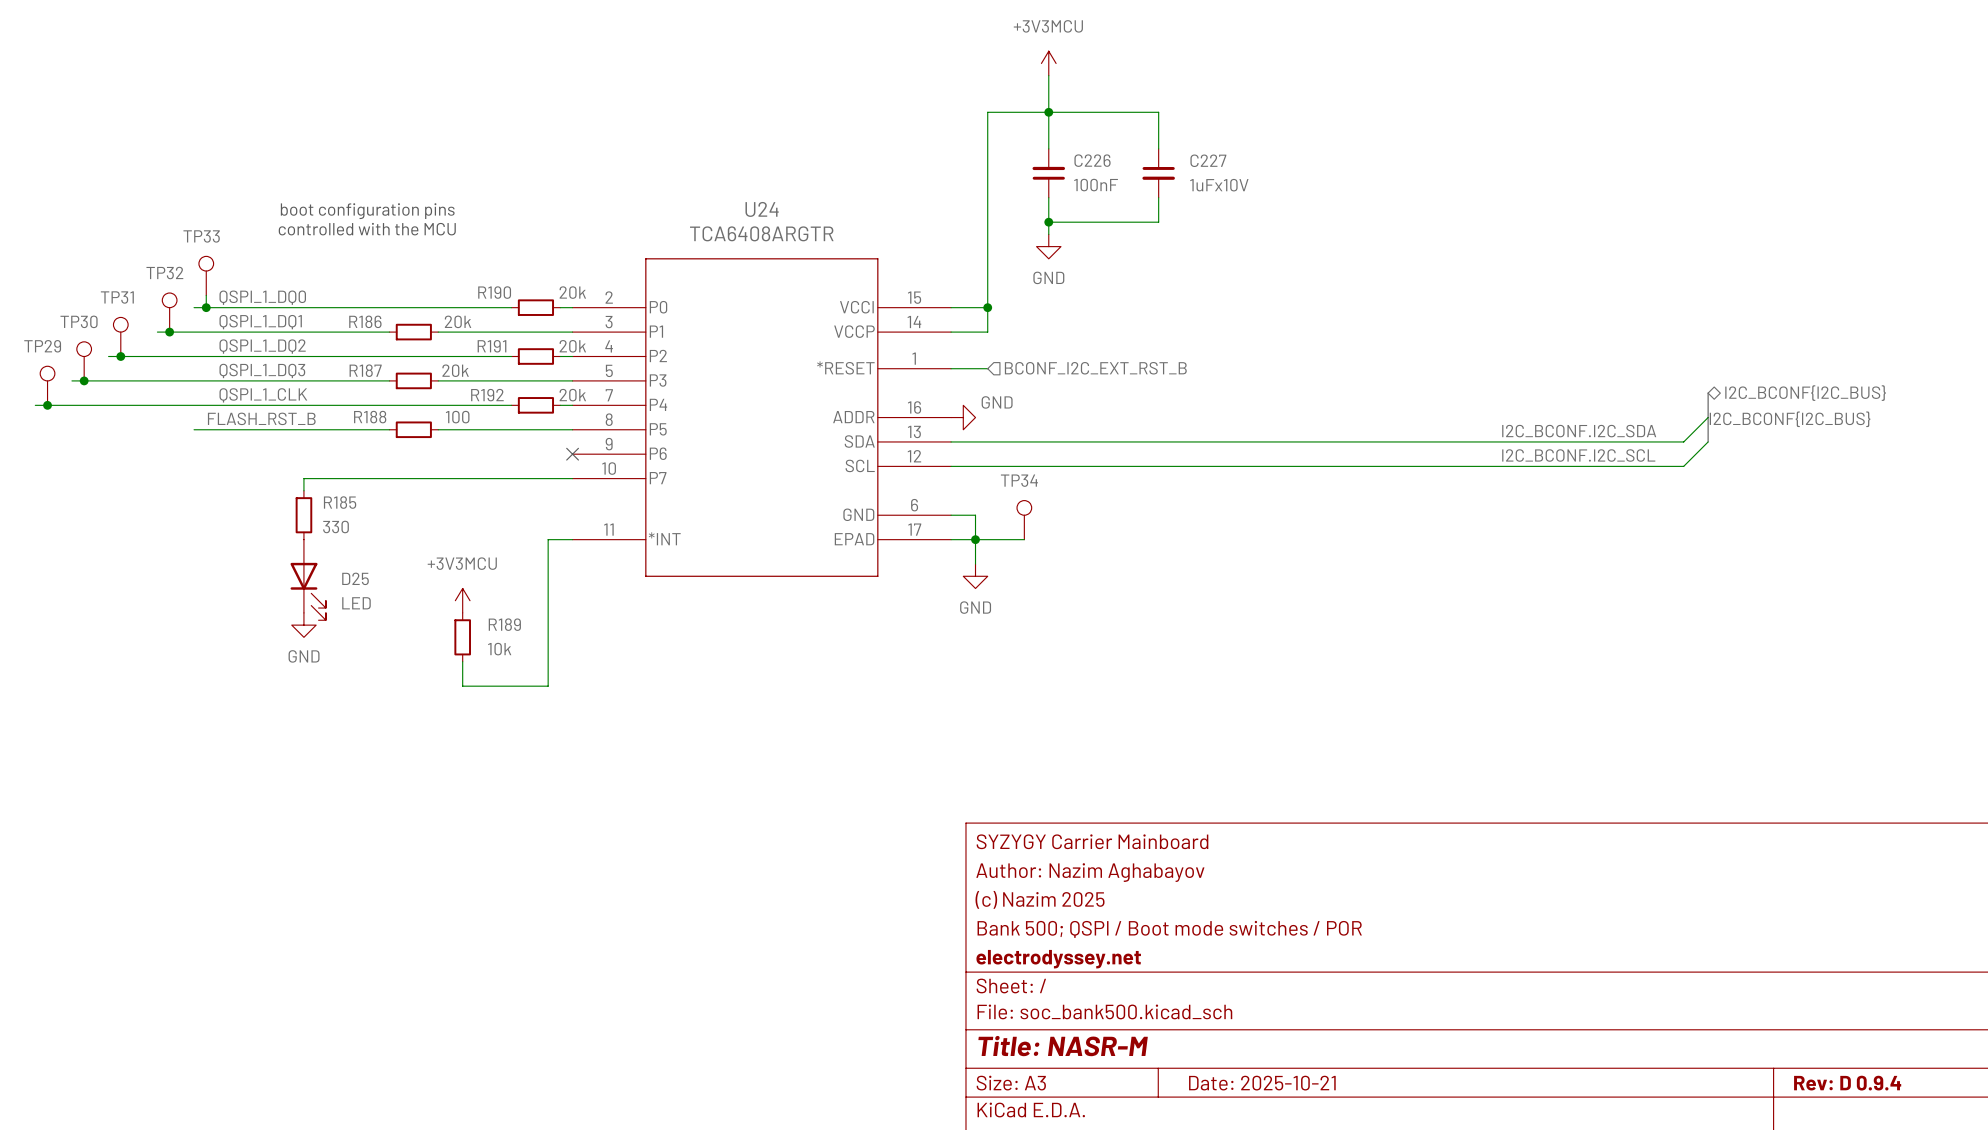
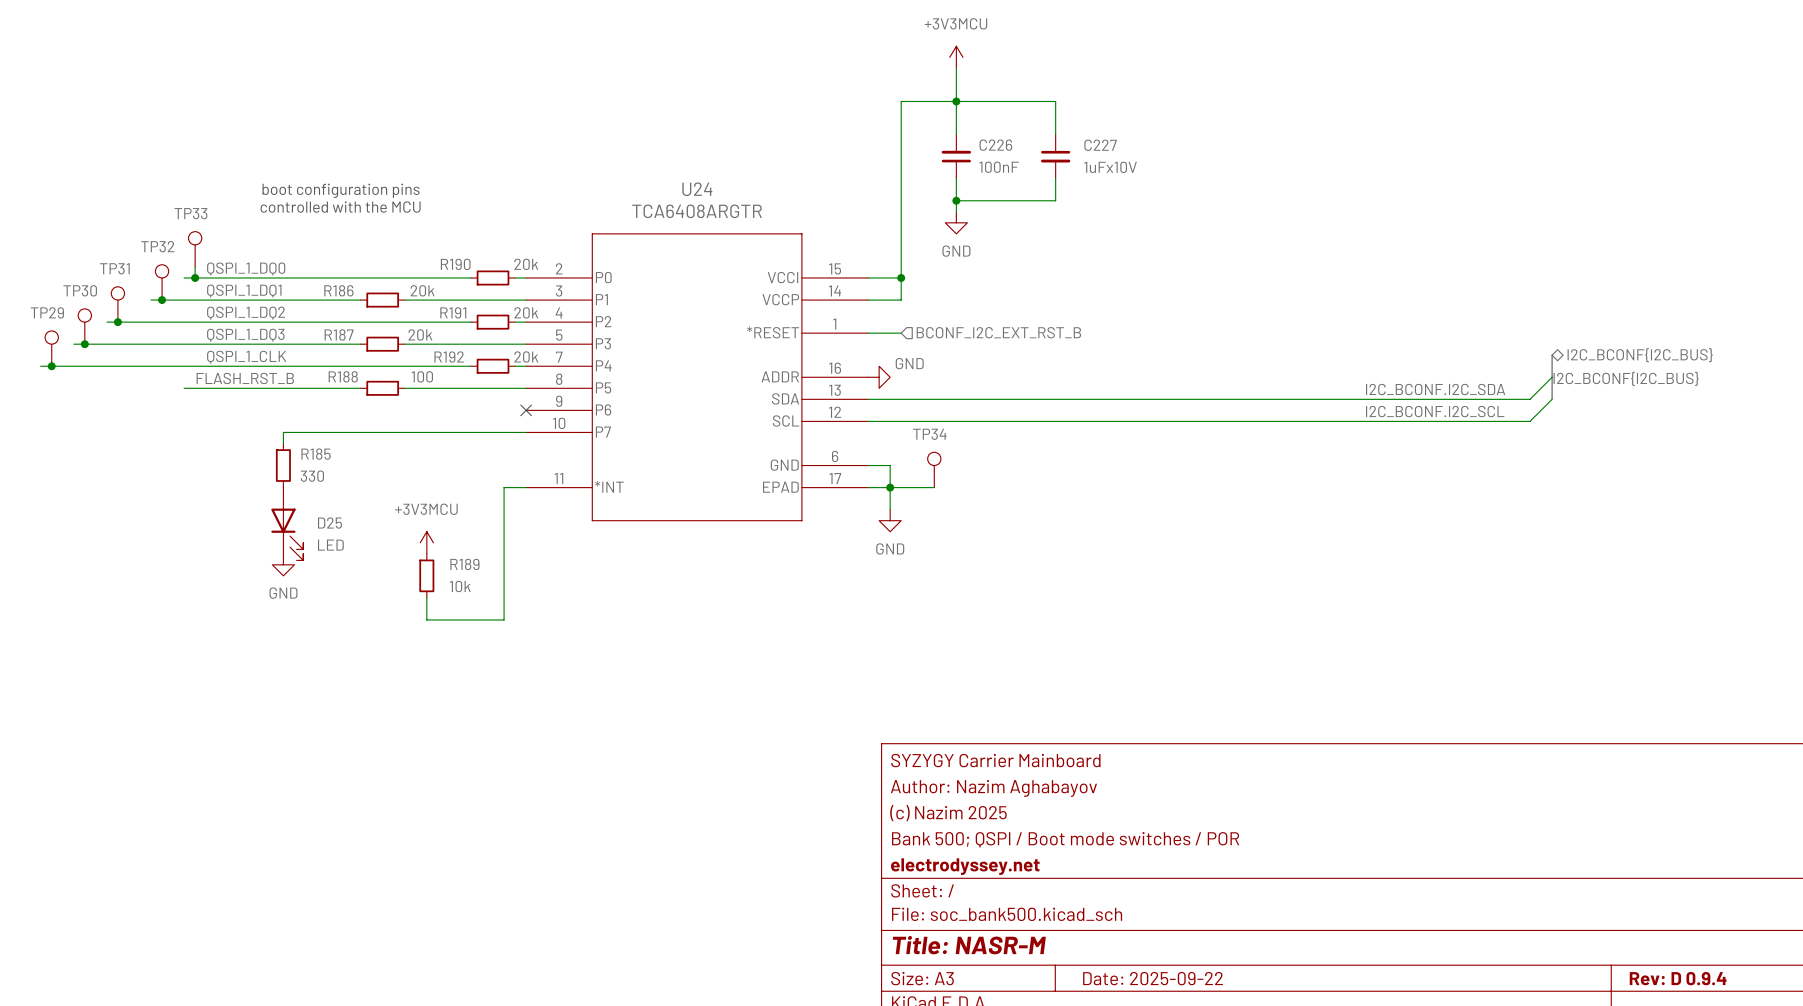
title block: Date: 2025-10-21 (1262, 1083) -> Date: 2025-09-22 (1153, 978)

